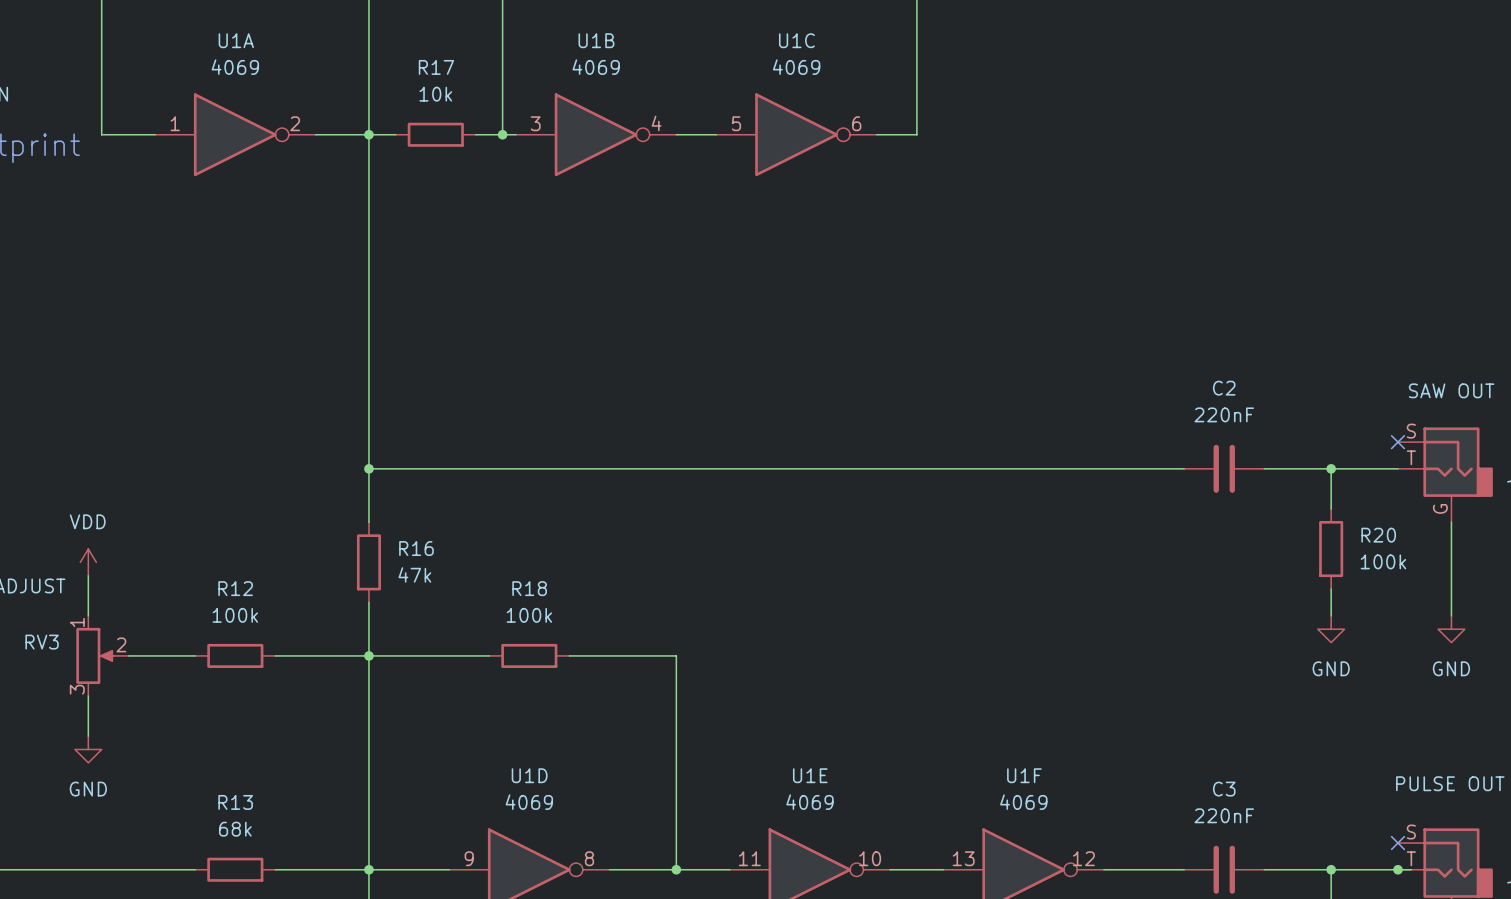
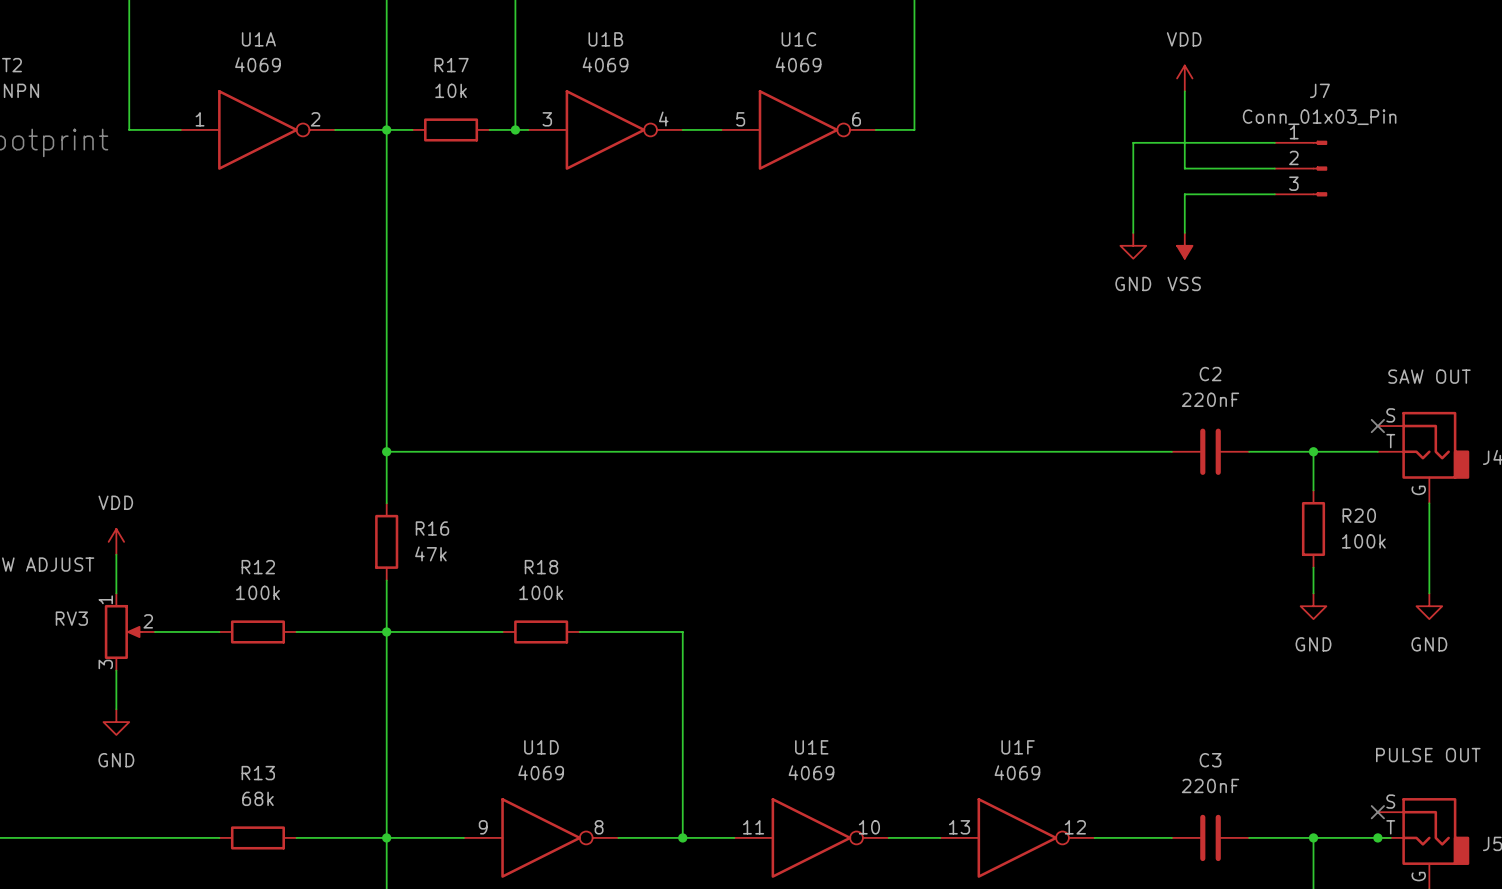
power symbol: none -> VDD (1184, 78)
wire: none -> (1184, 91) (1184, 168) (1274, 168)
wire: none -> (1274, 142) (1133, 142) (1133, 232)
J7: none -> Conn_01x03_Pin (1301, 168)
wire: none -> (1274, 194) (1184, 194) (1184, 232)
power symbol: none -> GND (1133, 245)
power symbol: none -> VSS (1184, 245)

